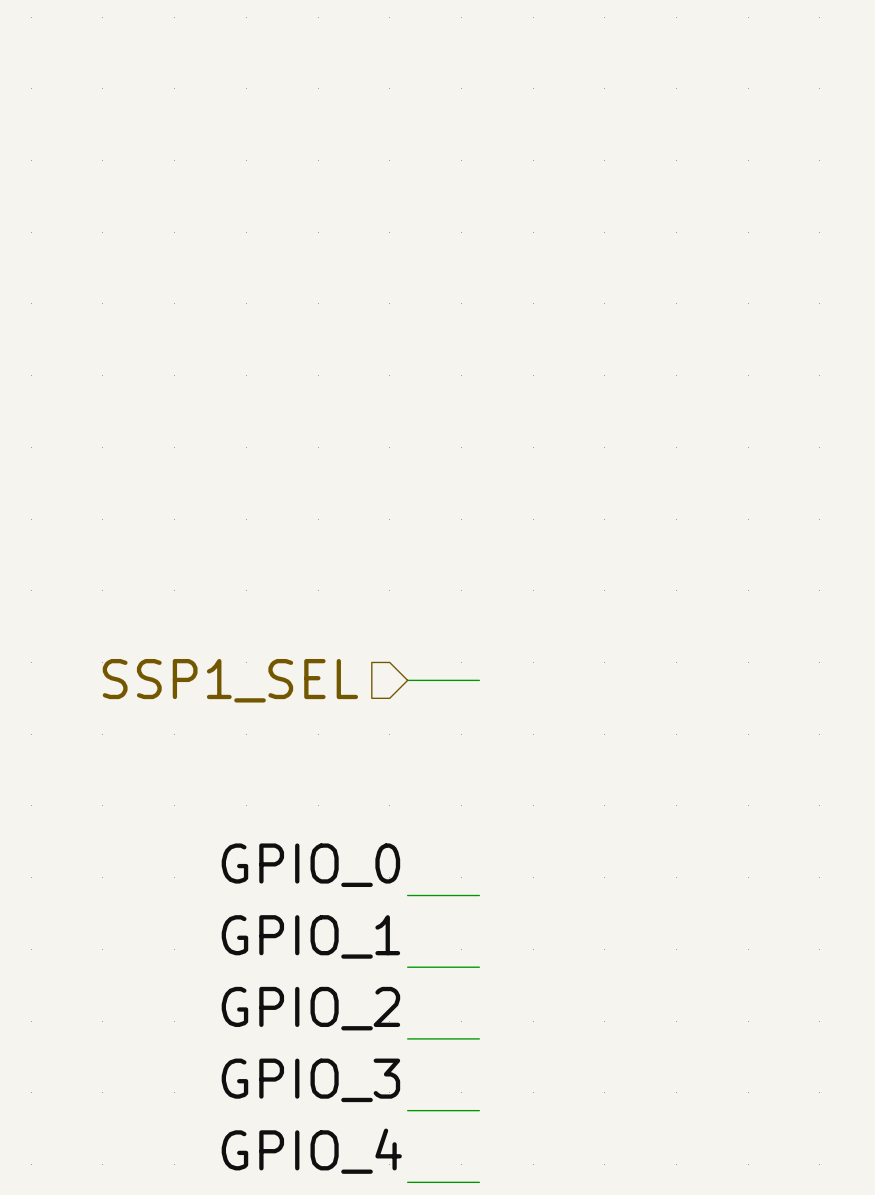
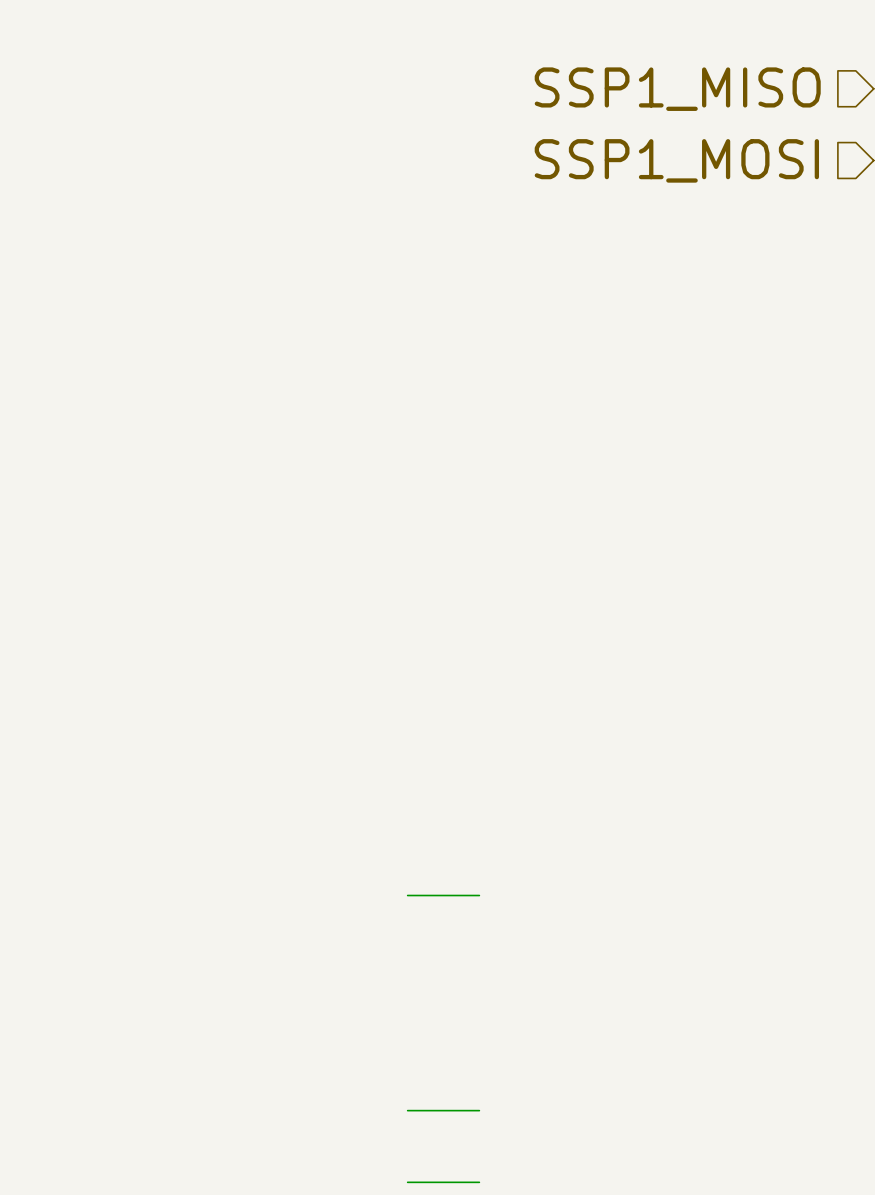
hierarchical label: none -> SSP1_MISO (677, 89)
hierarchical label: none -> SSP1_MOSI (676, 160)
hierarchical label: SSP1_SEL (230, 680) -> none
wire: (407, 680) (479, 680) -> none
label: GPIO_0 (310, 865) -> none
label: GPIO_1 (310, 936) -> none
wire: (407, 967) (479, 967) -> none
label: GPIO_2 (310, 1008) -> none
wire: (407, 1038) (479, 1038) -> none
label: GPIO_3 (310, 1080) -> none
label: GPIO_4 (311, 1151) -> none

